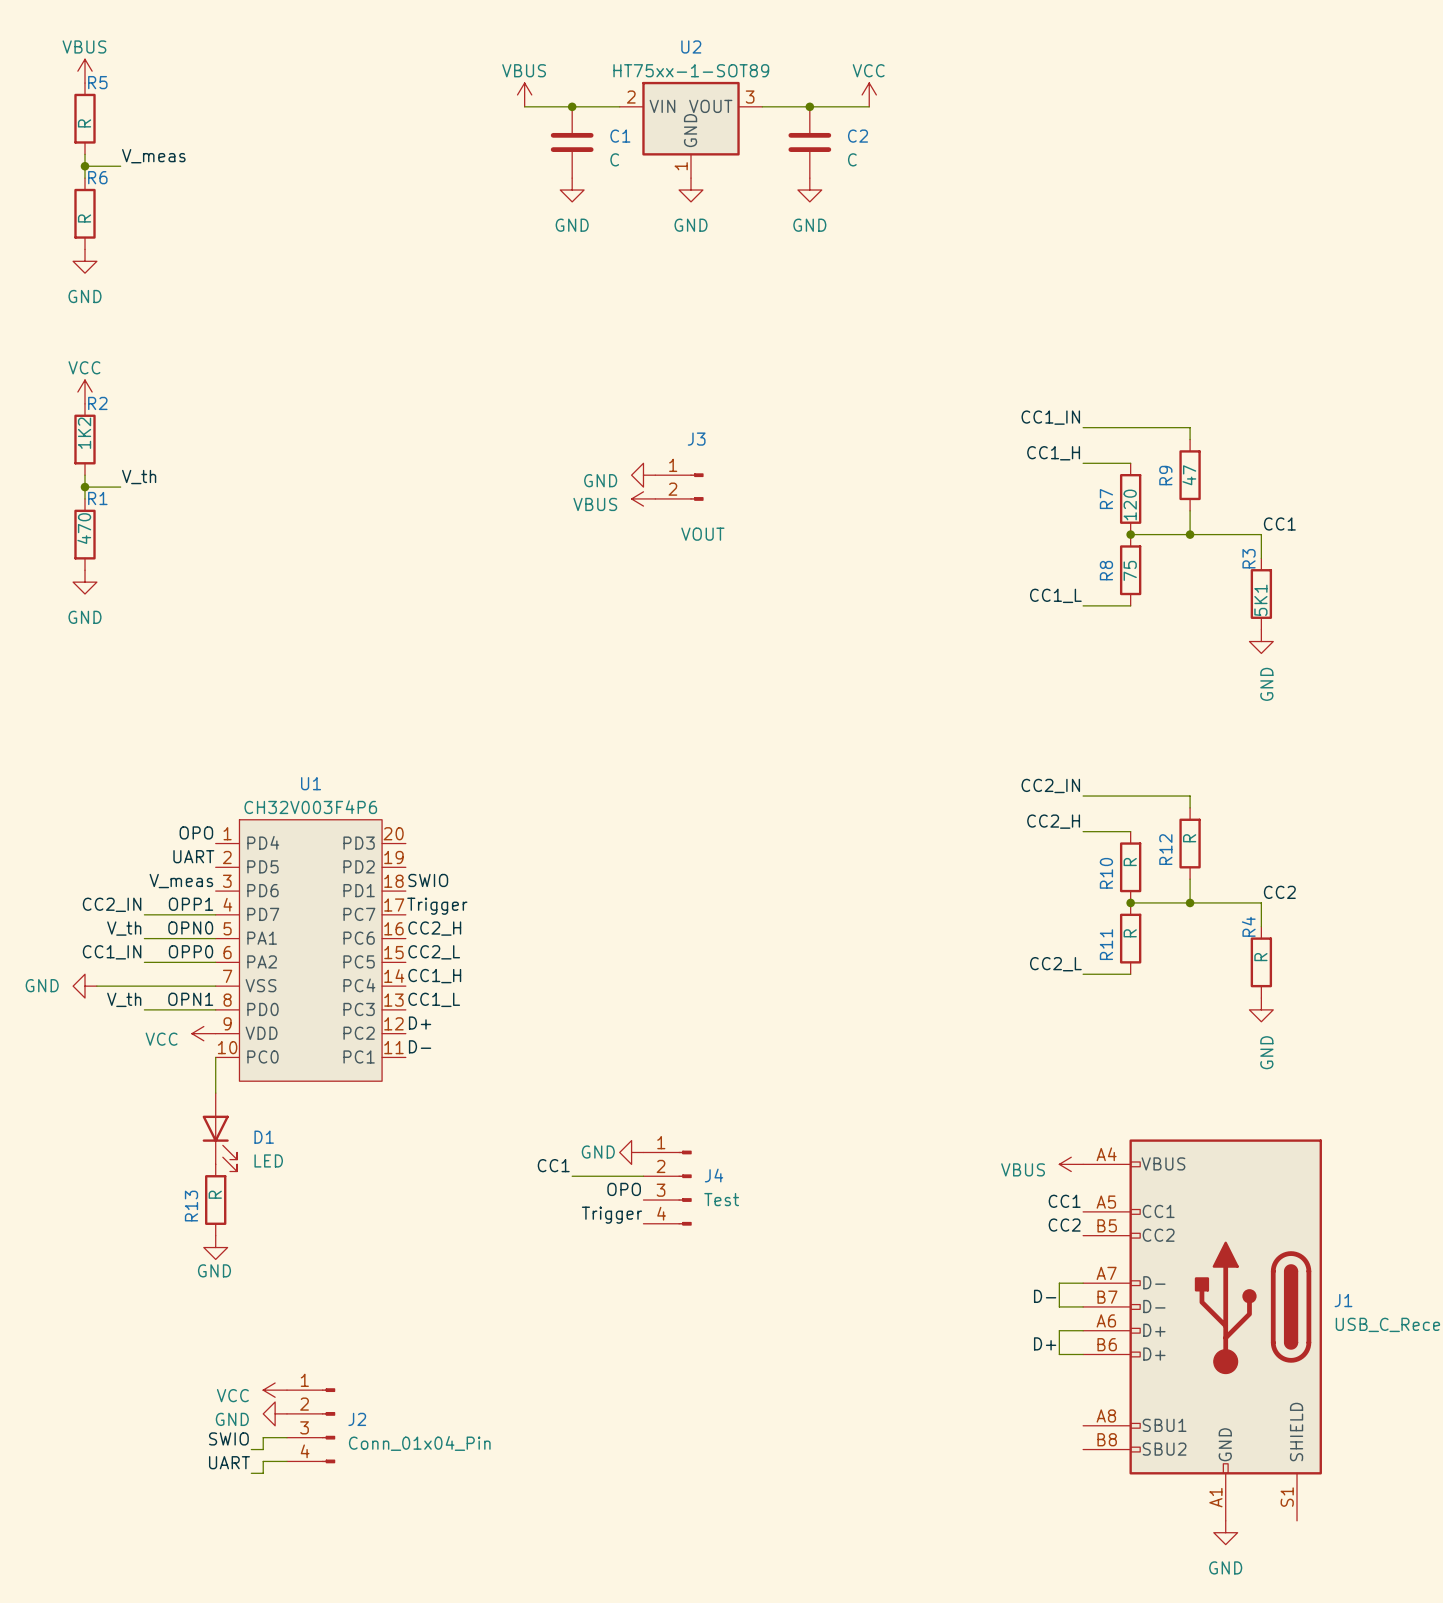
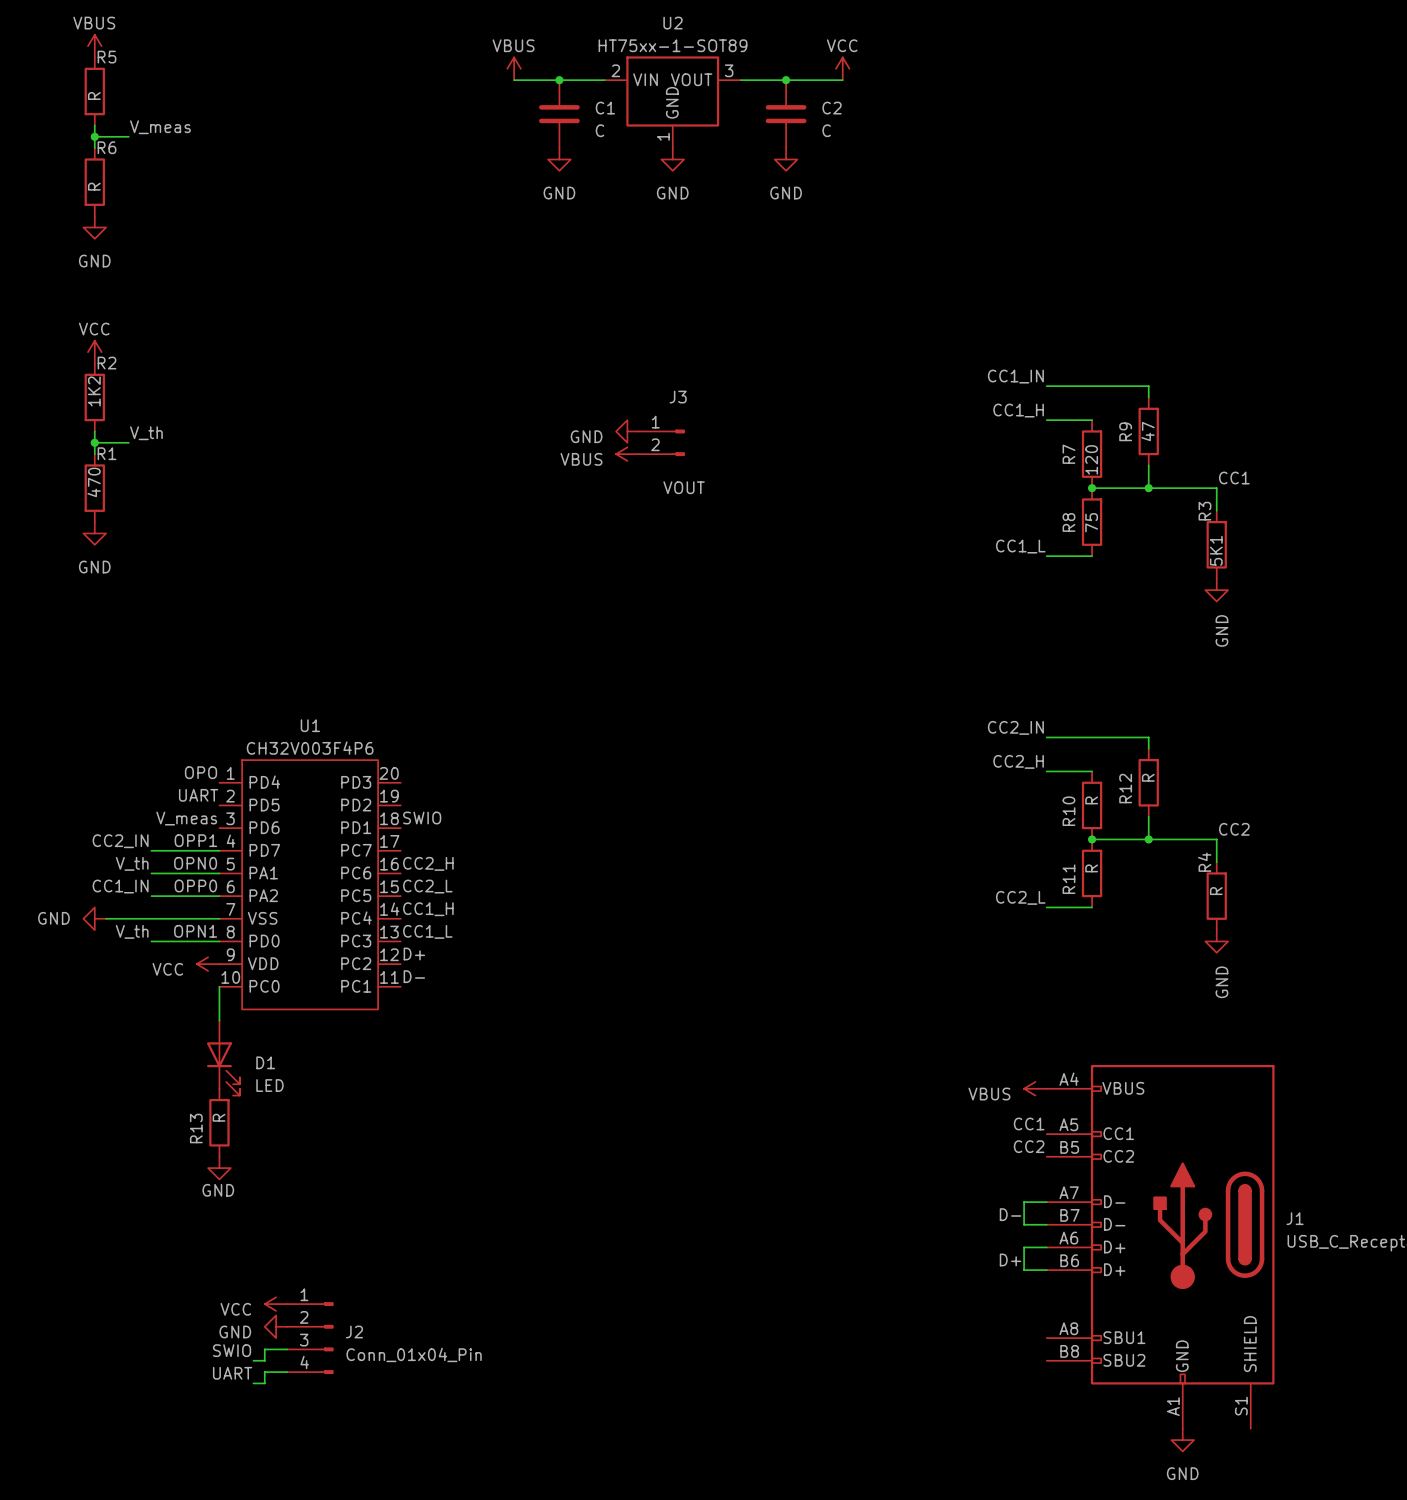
label: Trigger (437, 906) -> none
power symbol: GND (631, 1152) -> none
label: CC1 (553, 1165) -> none
wire: (572, 1176) (643, 1176) -> none
J4: Test (667, 1188) -> none
label: OPO (624, 1189) -> none
label: Trigger (611, 1215) -> none

